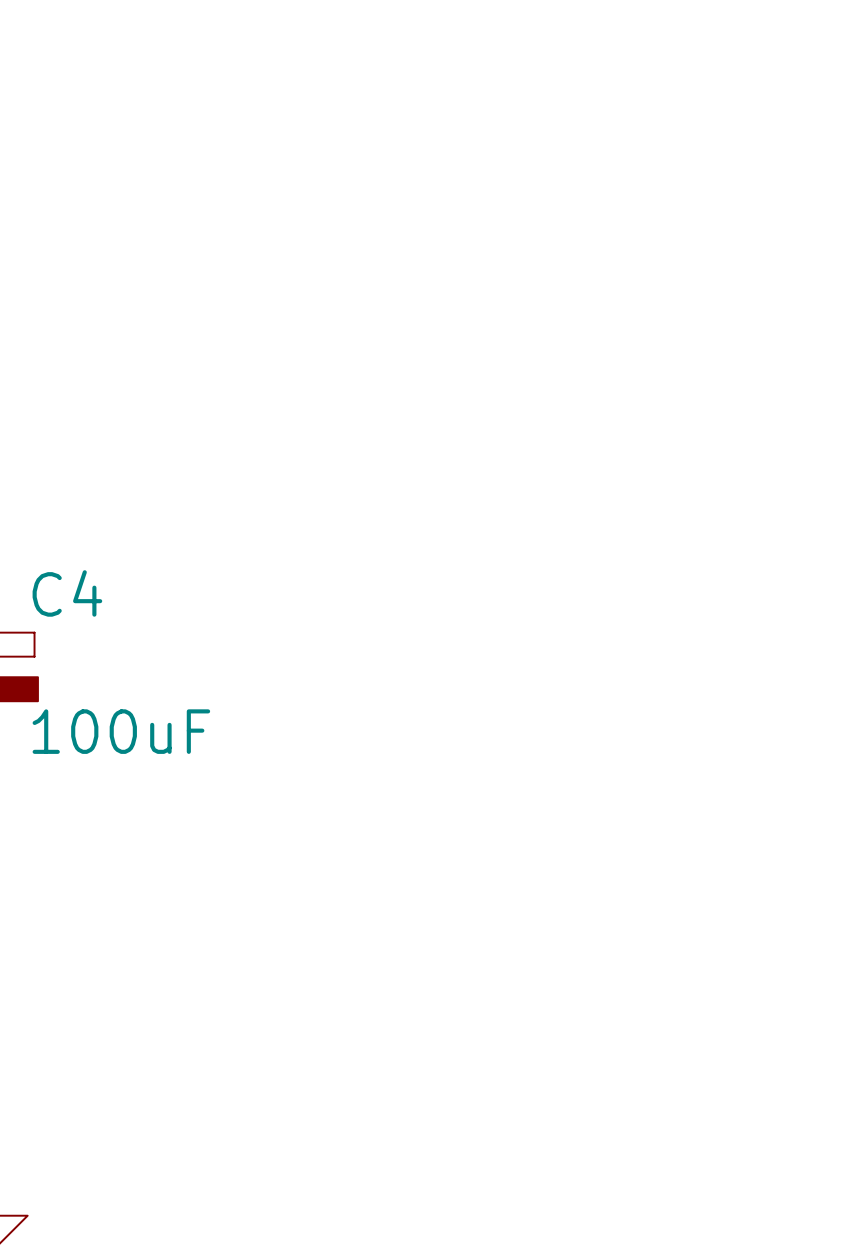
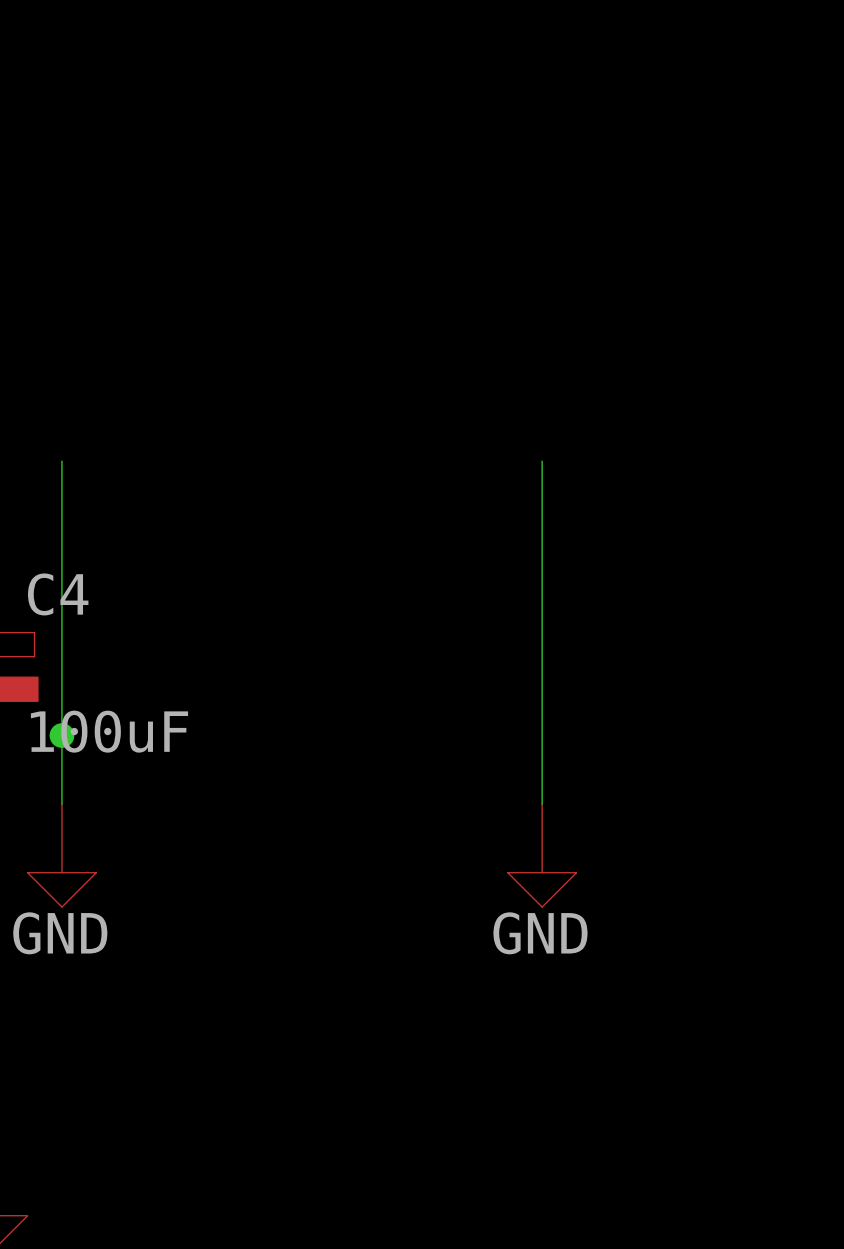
wire: none -> (61, 461) (61, 804)
wire: none -> (542, 461) (542, 804)
junction: none -> (61, 735)
power symbol: none -> GND (61, 855)
power symbol: none -> GND (542, 855)

